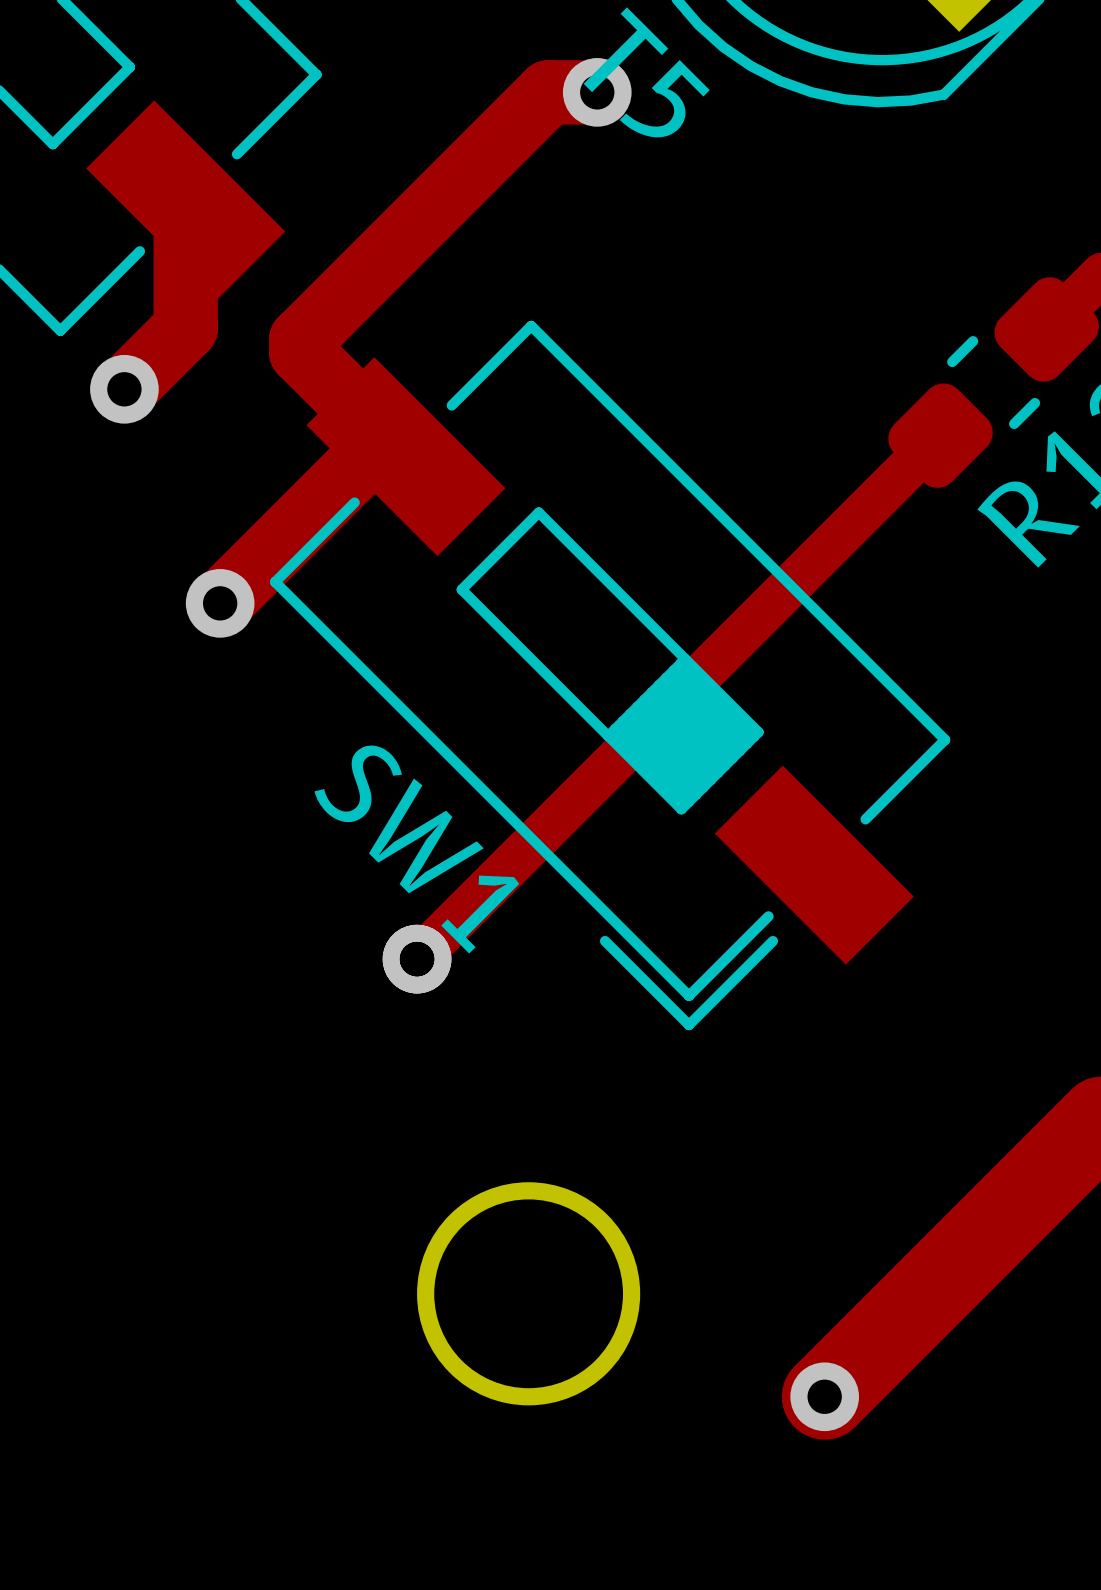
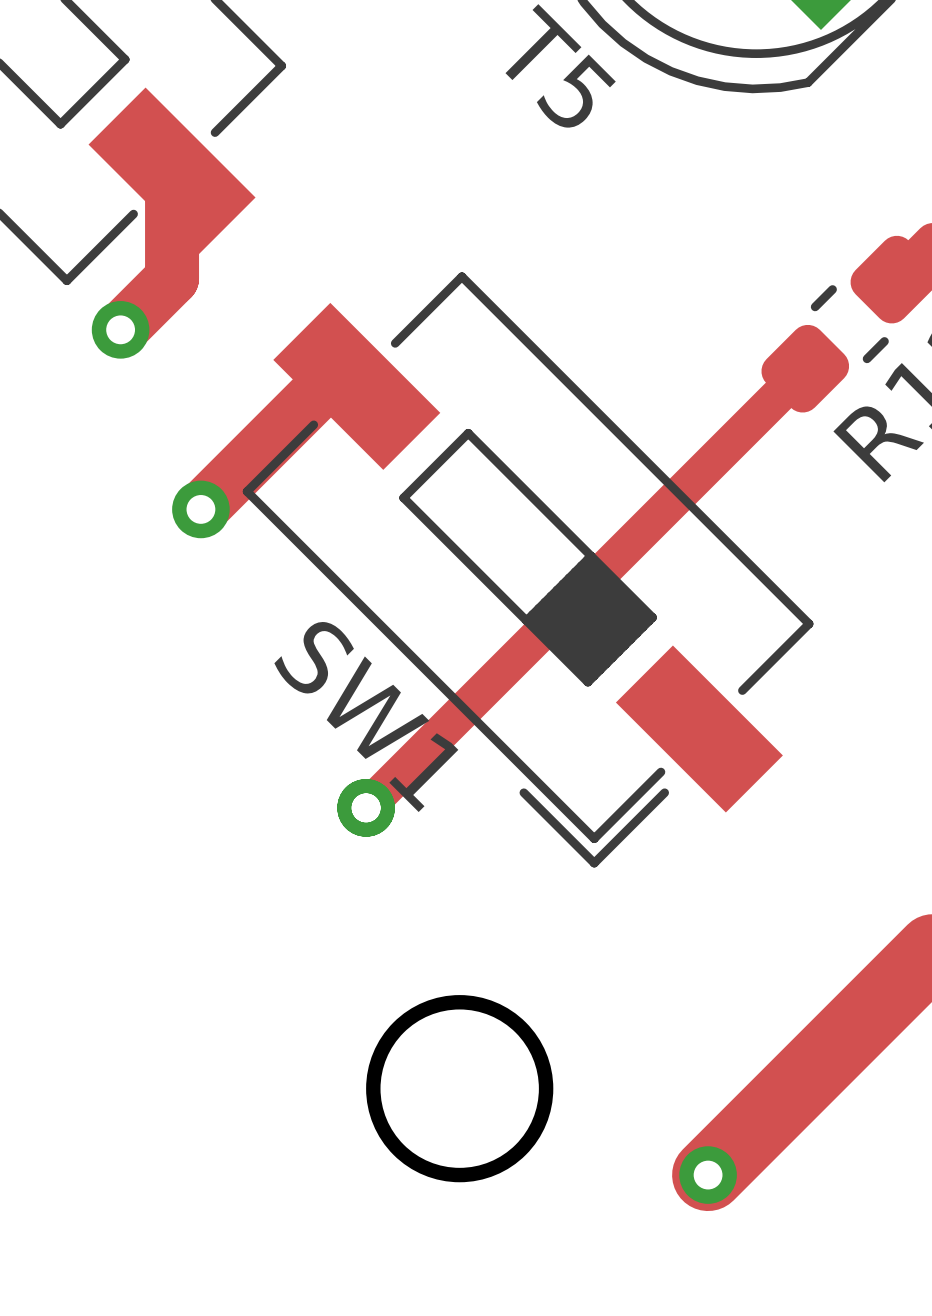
track: (597, 92) (548, 92) (301, 339) (301, 351) (405, 456) -> none
via: (597, 92) -> none

